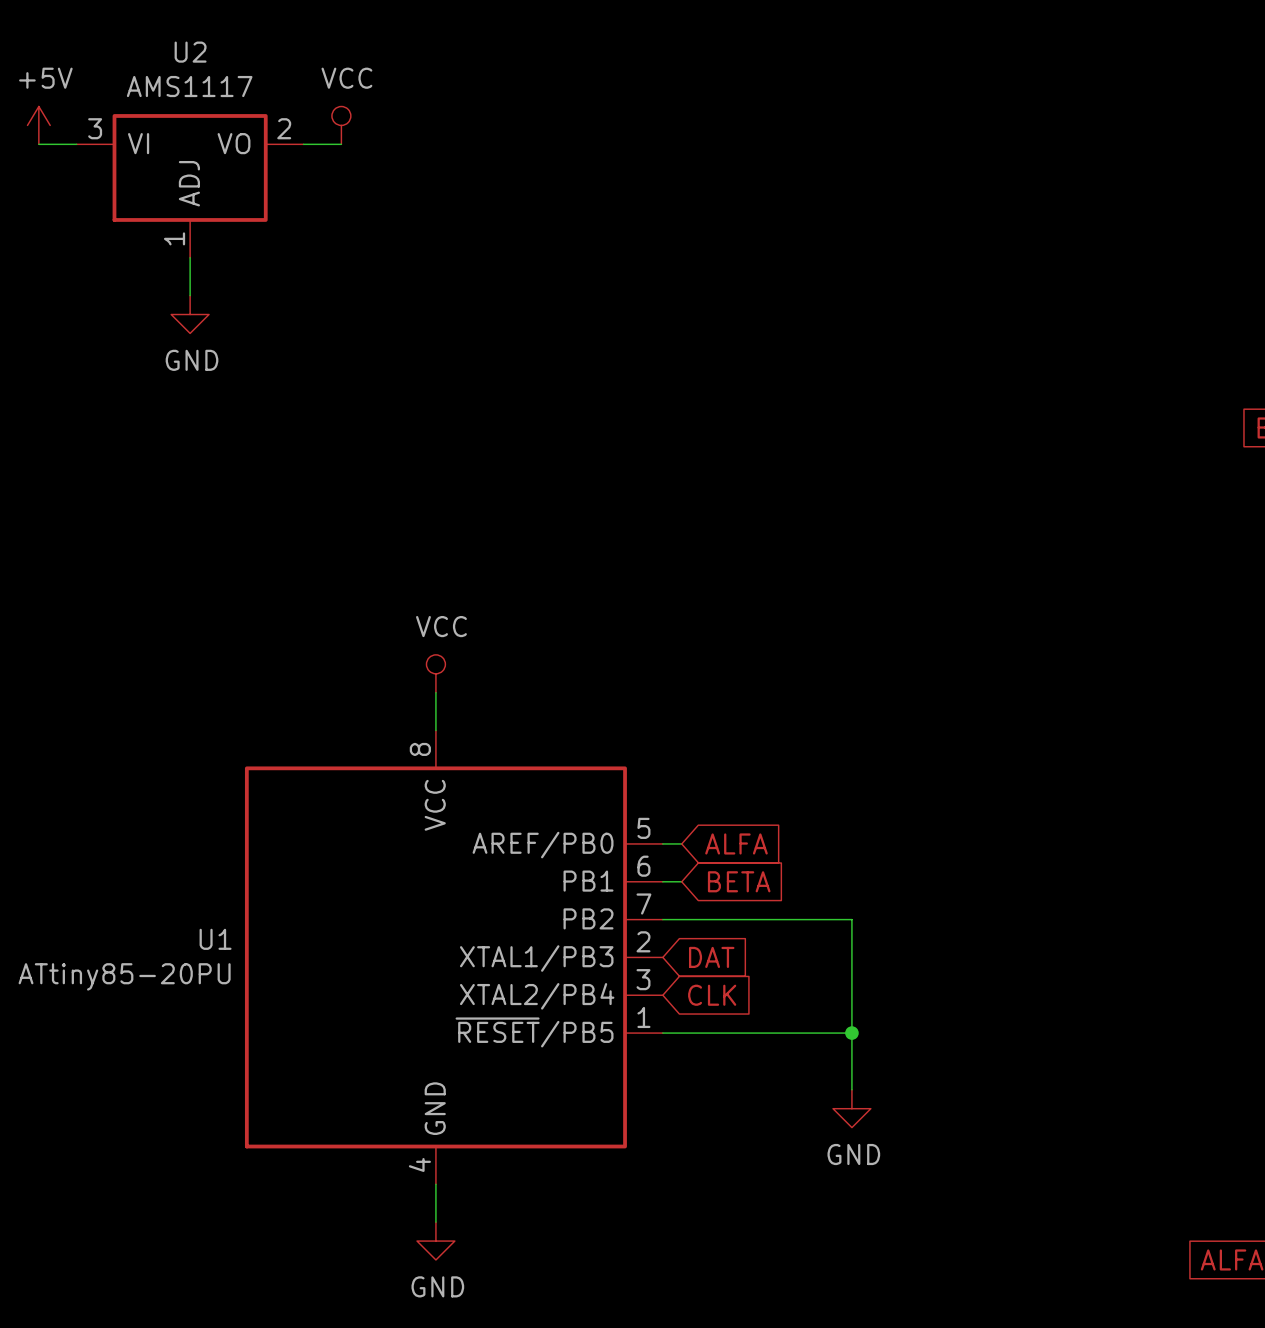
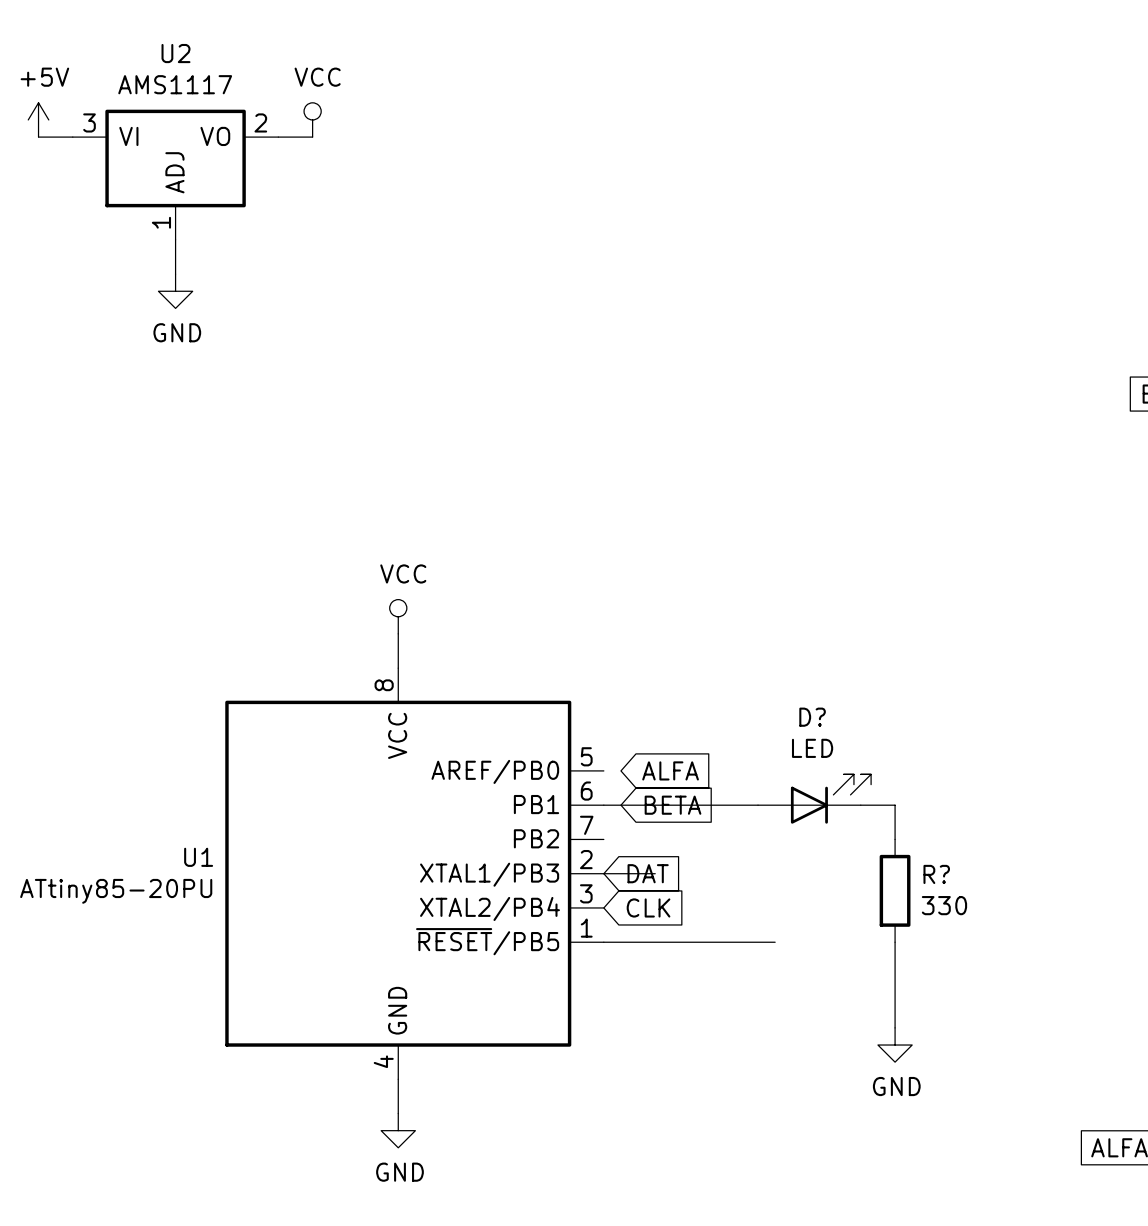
wire: (662, 843) (681, 843) -> none
D?: none -> LED (814, 799)
wire: none -> (620, 805) (758, 805)
wire: none -> (860, 805) (895, 805) (895, 839)
wire: (662, 919) (851, 919) (851, 1089) -> none
wire: none -> (603, 873) (655, 873)
R?: none -> 330 (895, 890)
junction: (851, 1033) -> none
wire: none -> (895, 942) (895, 1027)
power symbol position: GND (851, 1108) -> GND (895, 1045)

